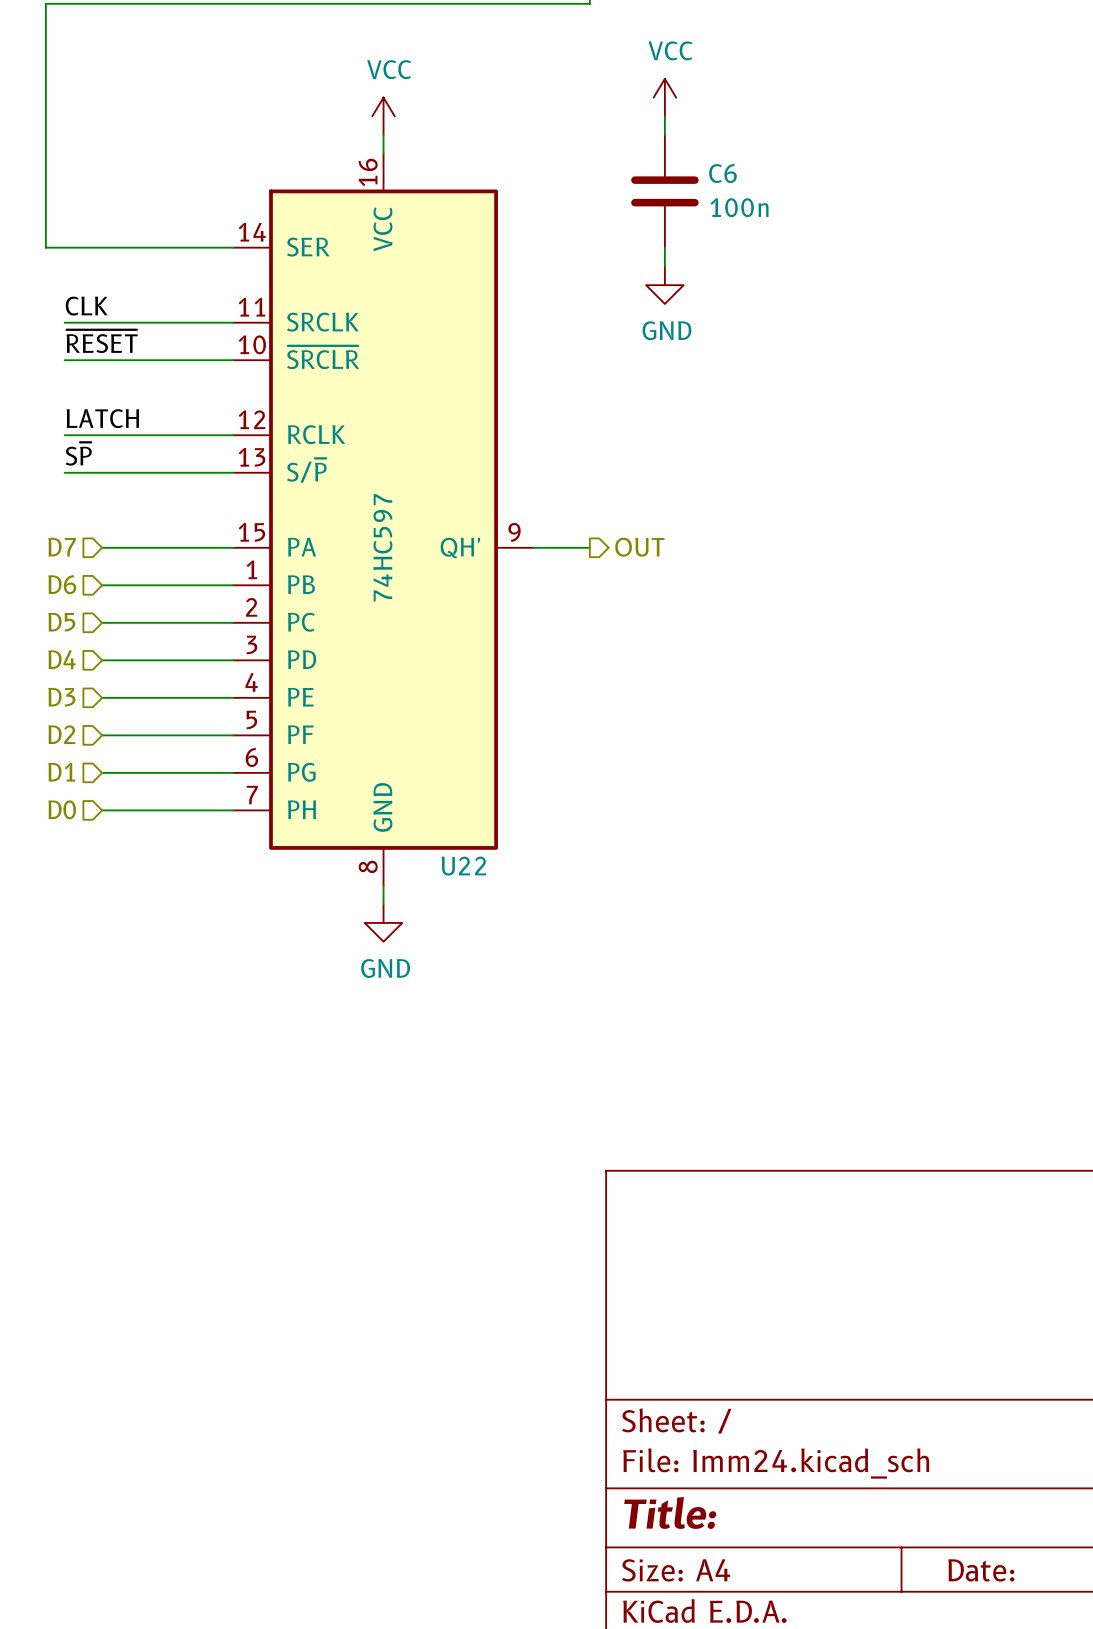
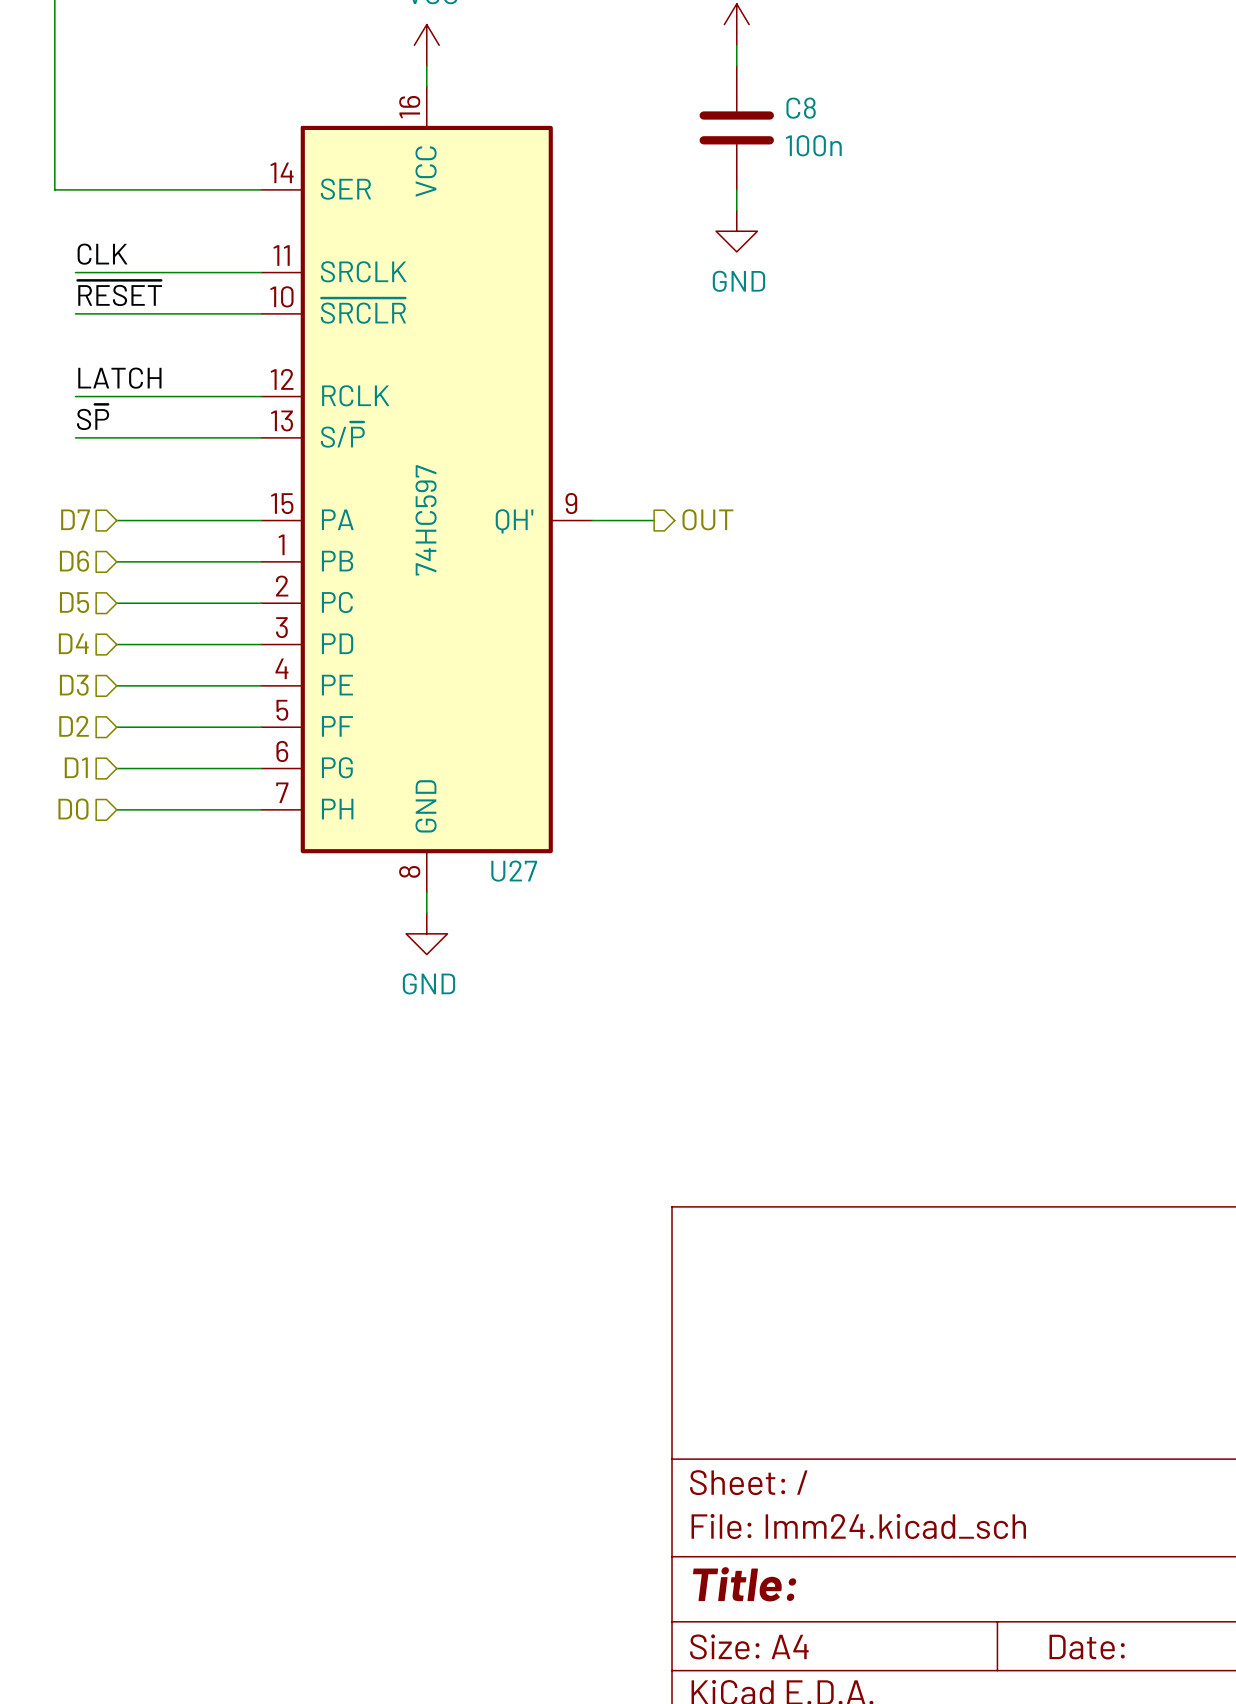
C6 name: C6 (722, 173) -> C8 (801, 108)
U22 name: U22 (463, 866) -> U27 (514, 871)

